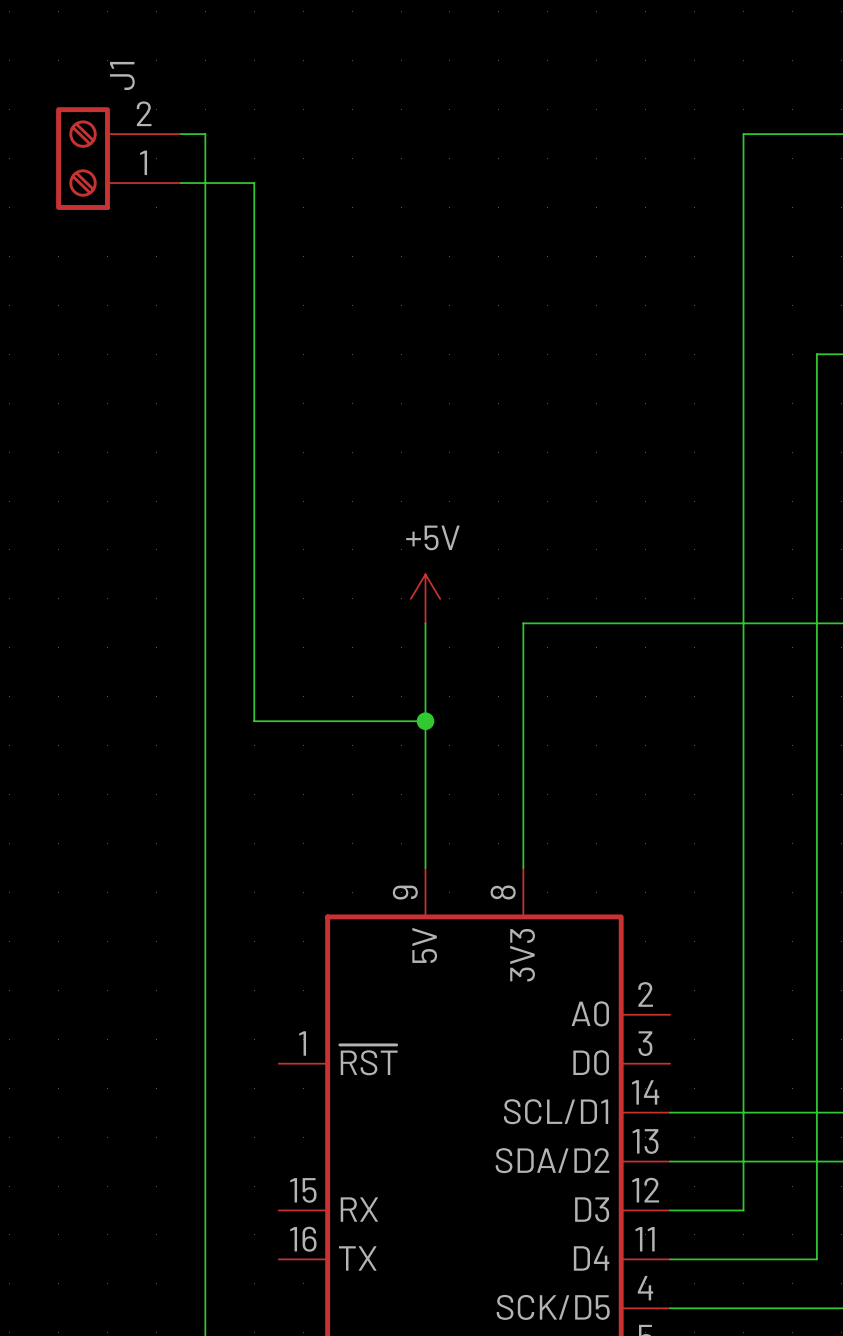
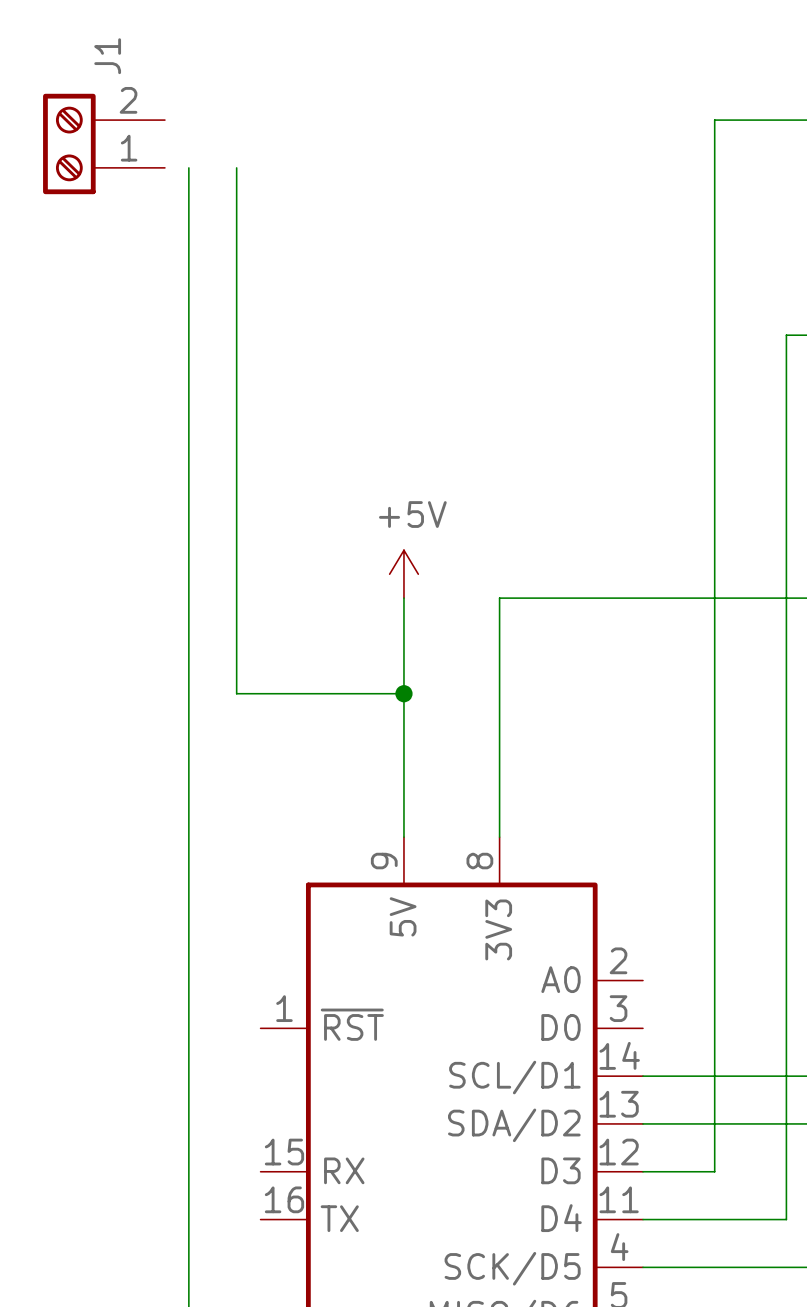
wire: (180, 134) (205, 134) (205, 183) -> none
wire: (180, 183) (254, 183) -> none

